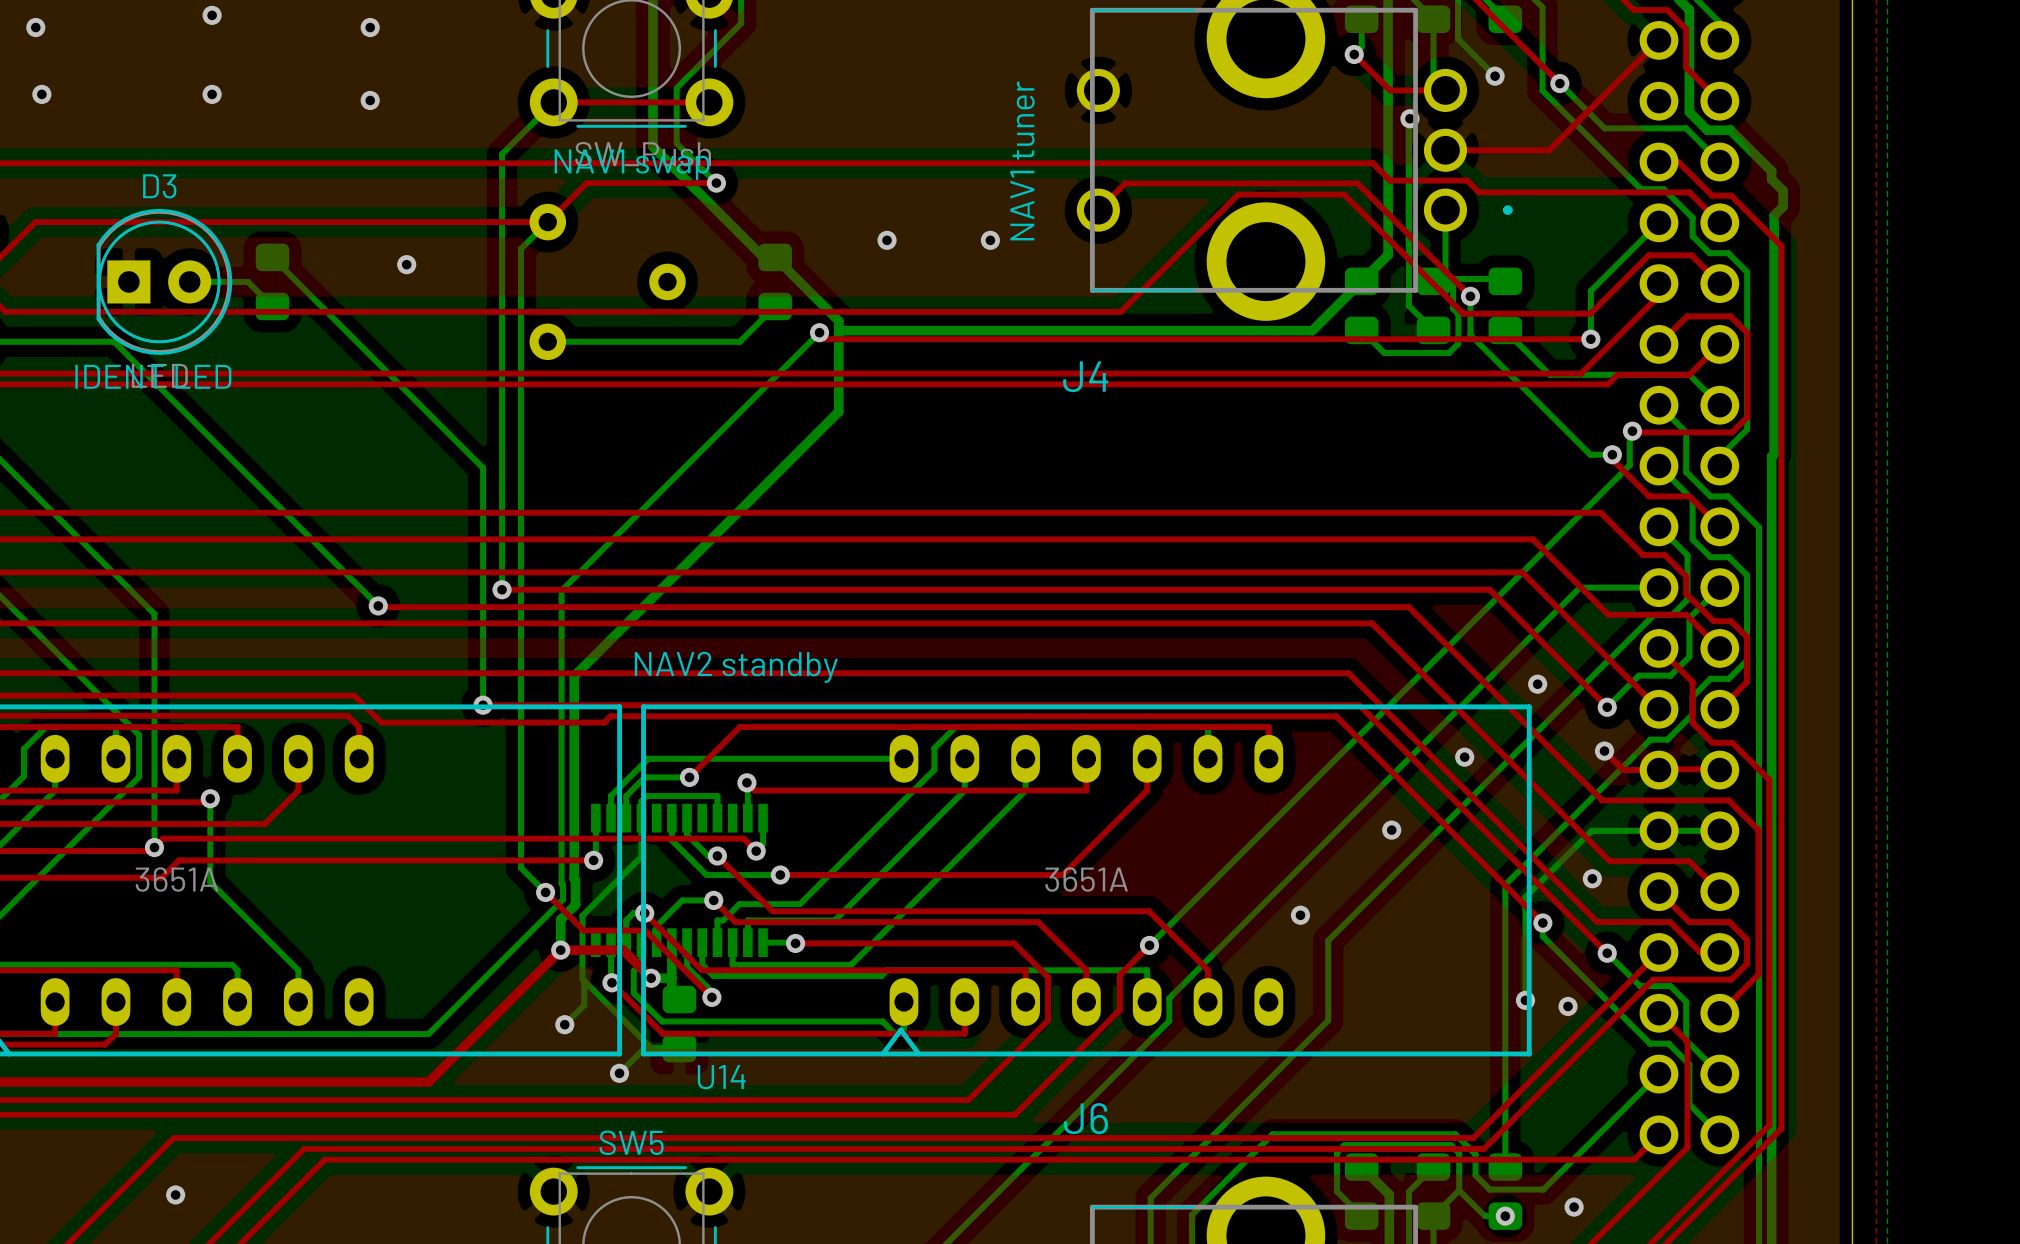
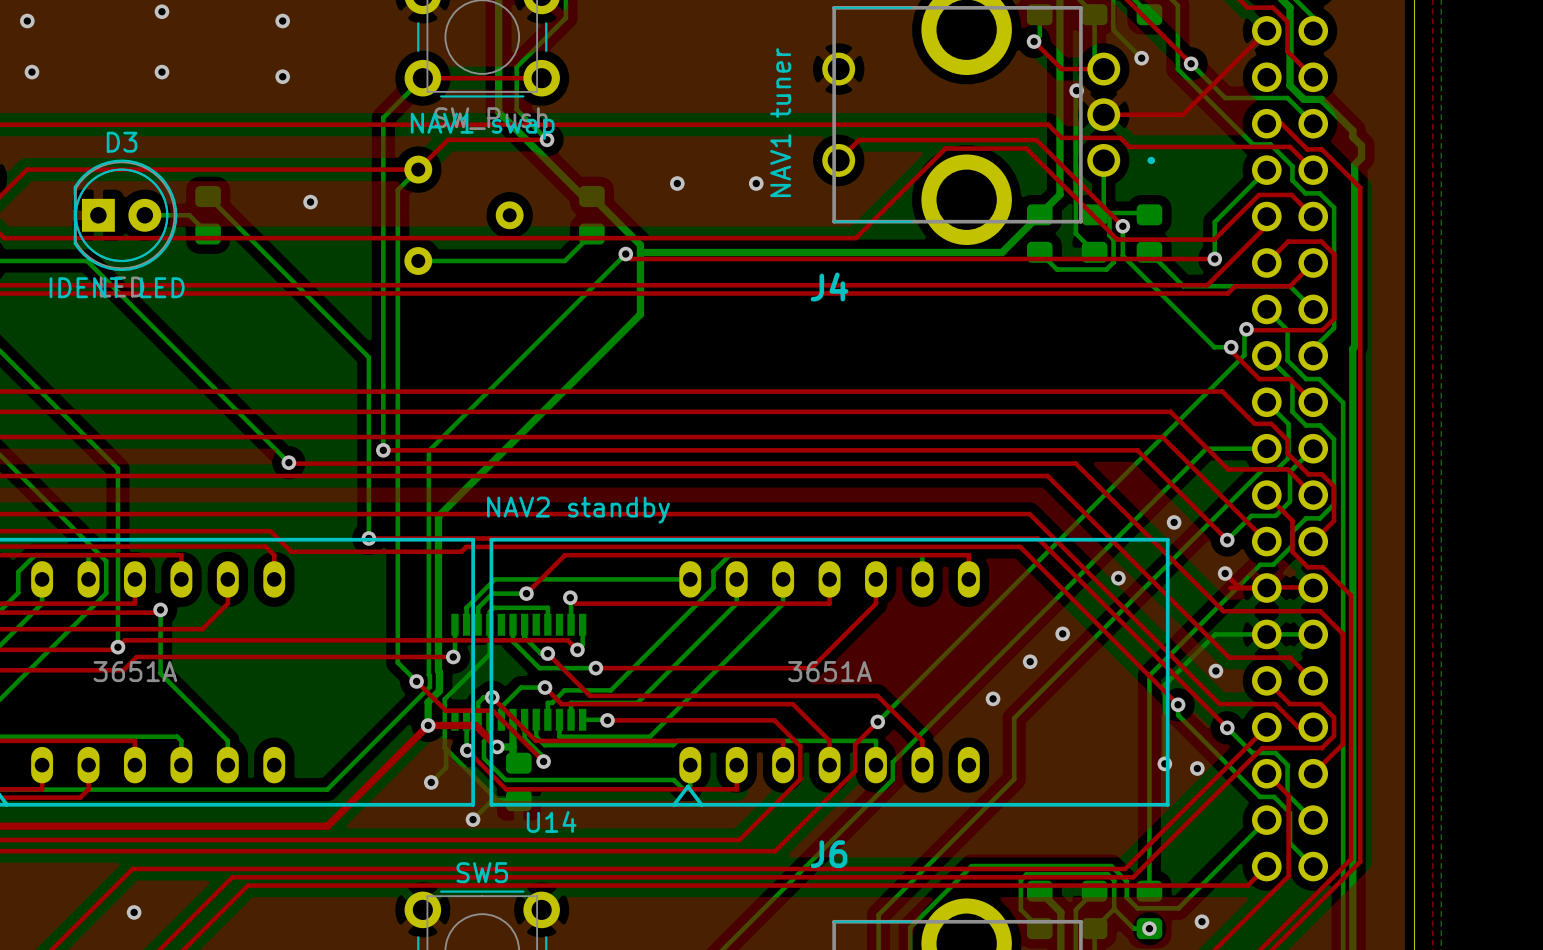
top track: none -> (1230, 587) (1239, 587)
via: none -> (1030, 661)

